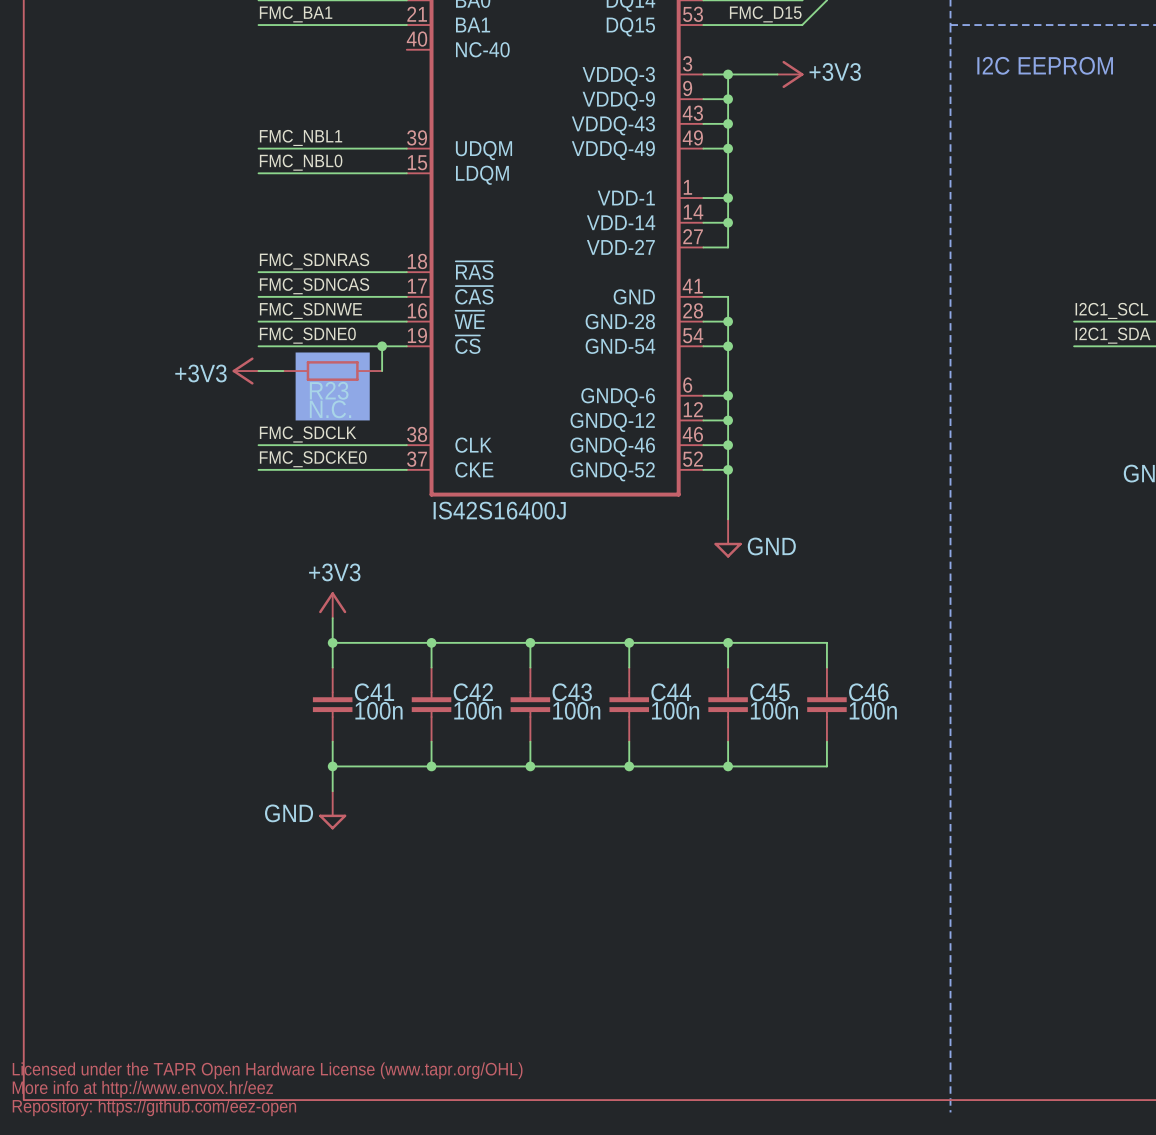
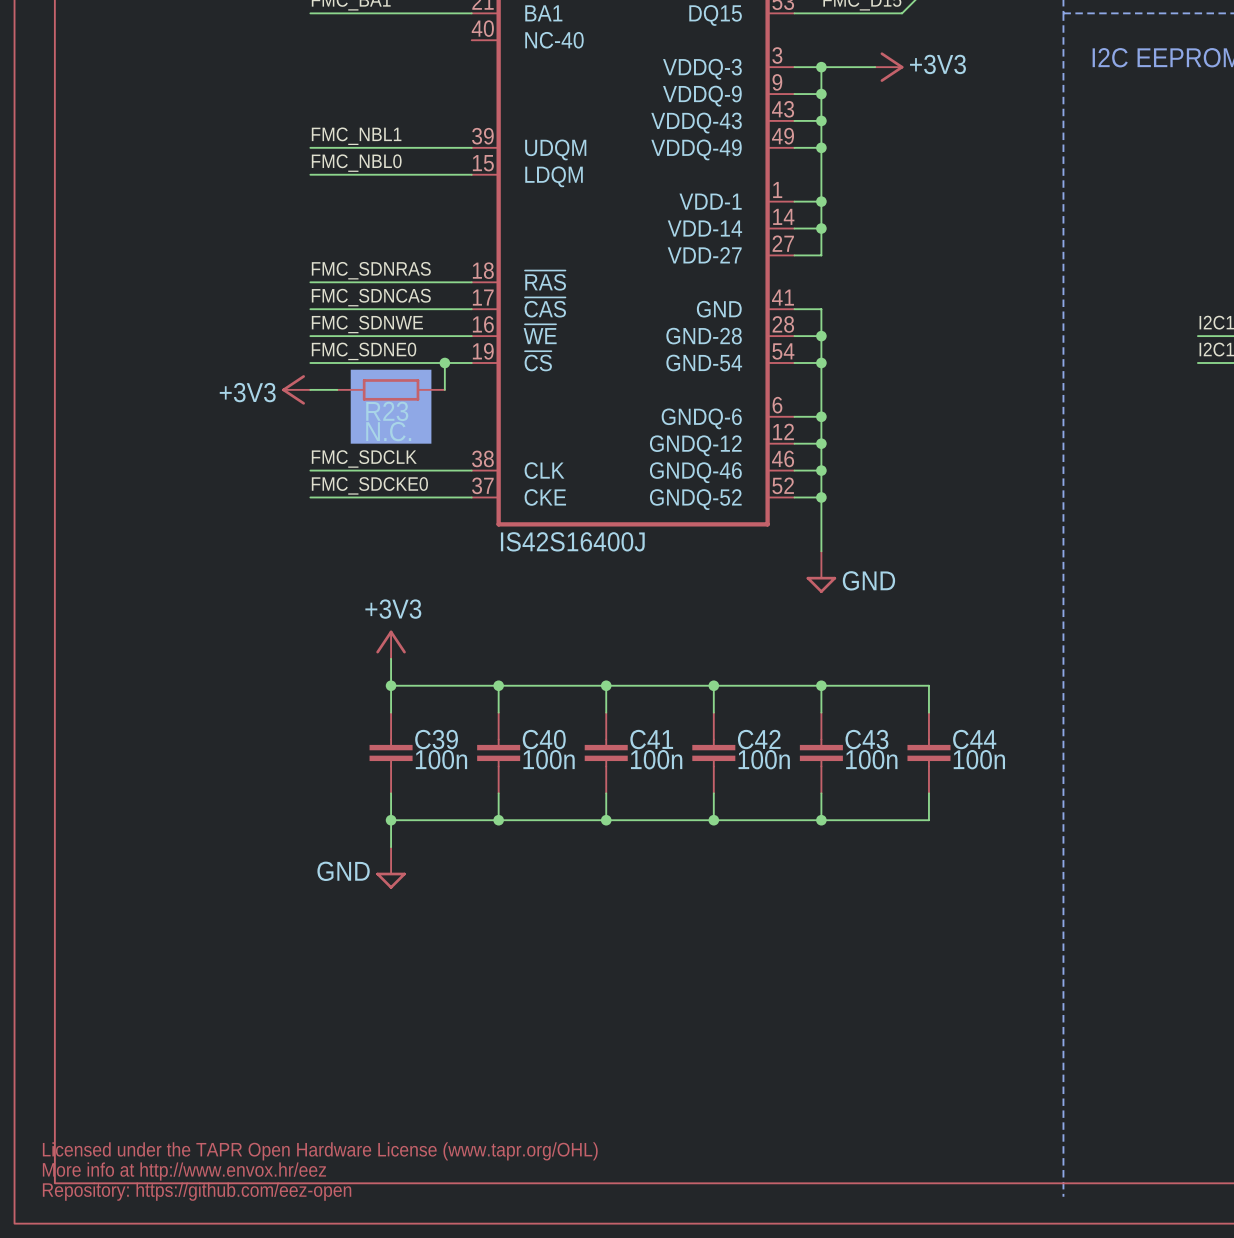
C41 name: C41 (374, 692) -> C39 (436, 739)
C42 name: C42 (473, 692) -> C40 (544, 739)
C43 name: C43 (572, 692) -> C41 (651, 739)
C44 name: C44 (671, 692) -> C42 (759, 739)
C45 name: C45 (769, 692) -> C43 (866, 739)
C46 name: C46 (868, 692) -> C44 (974, 739)

